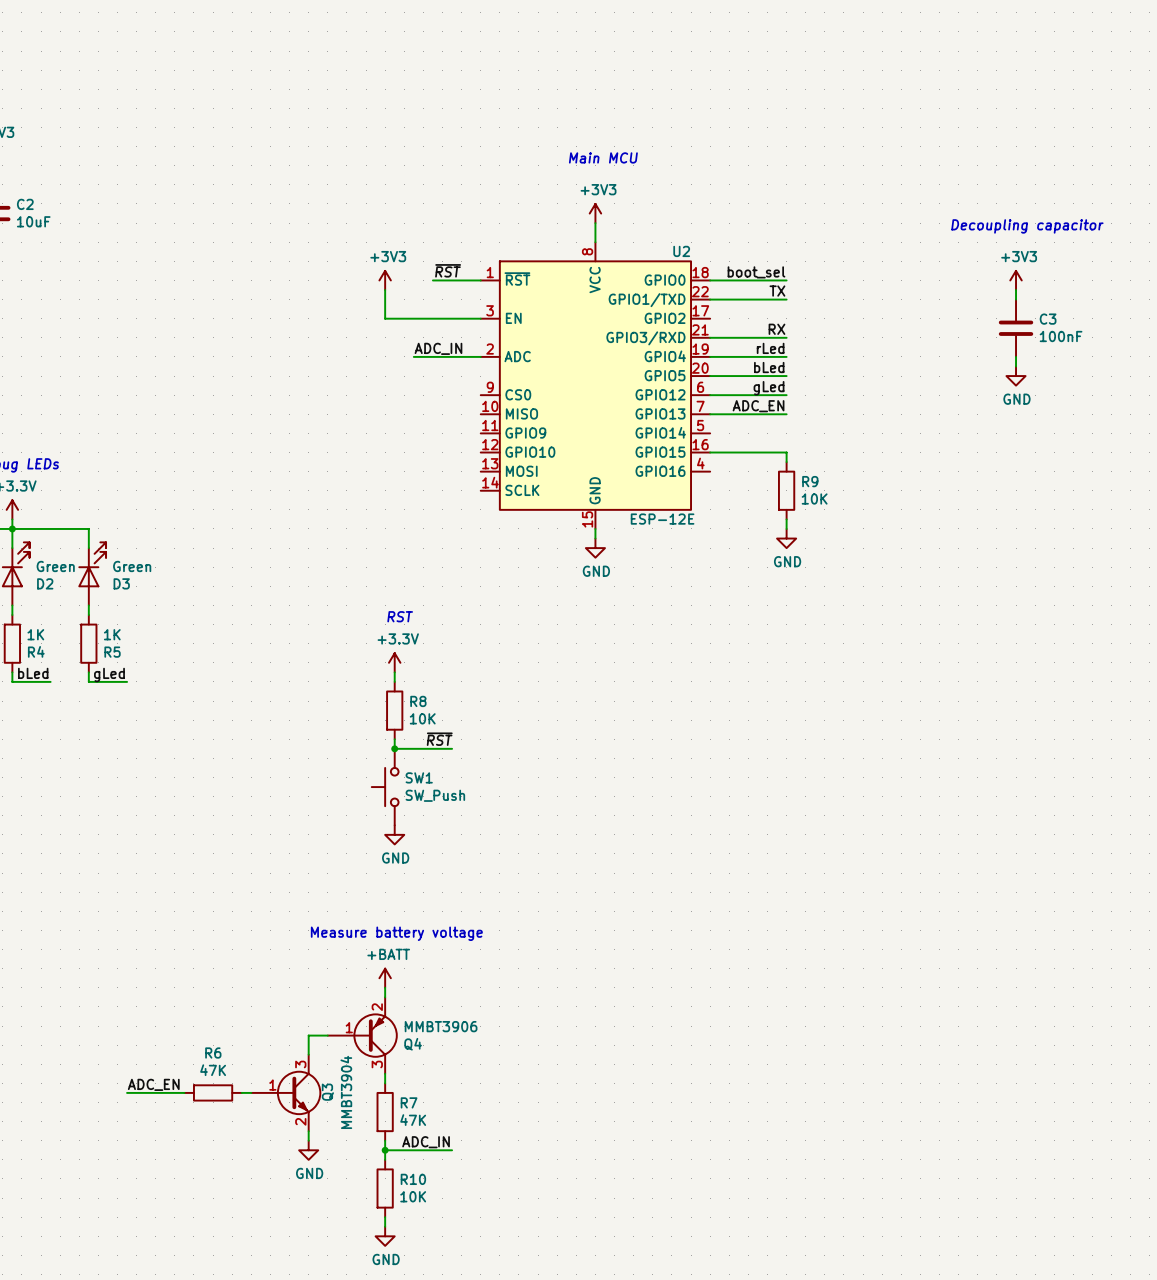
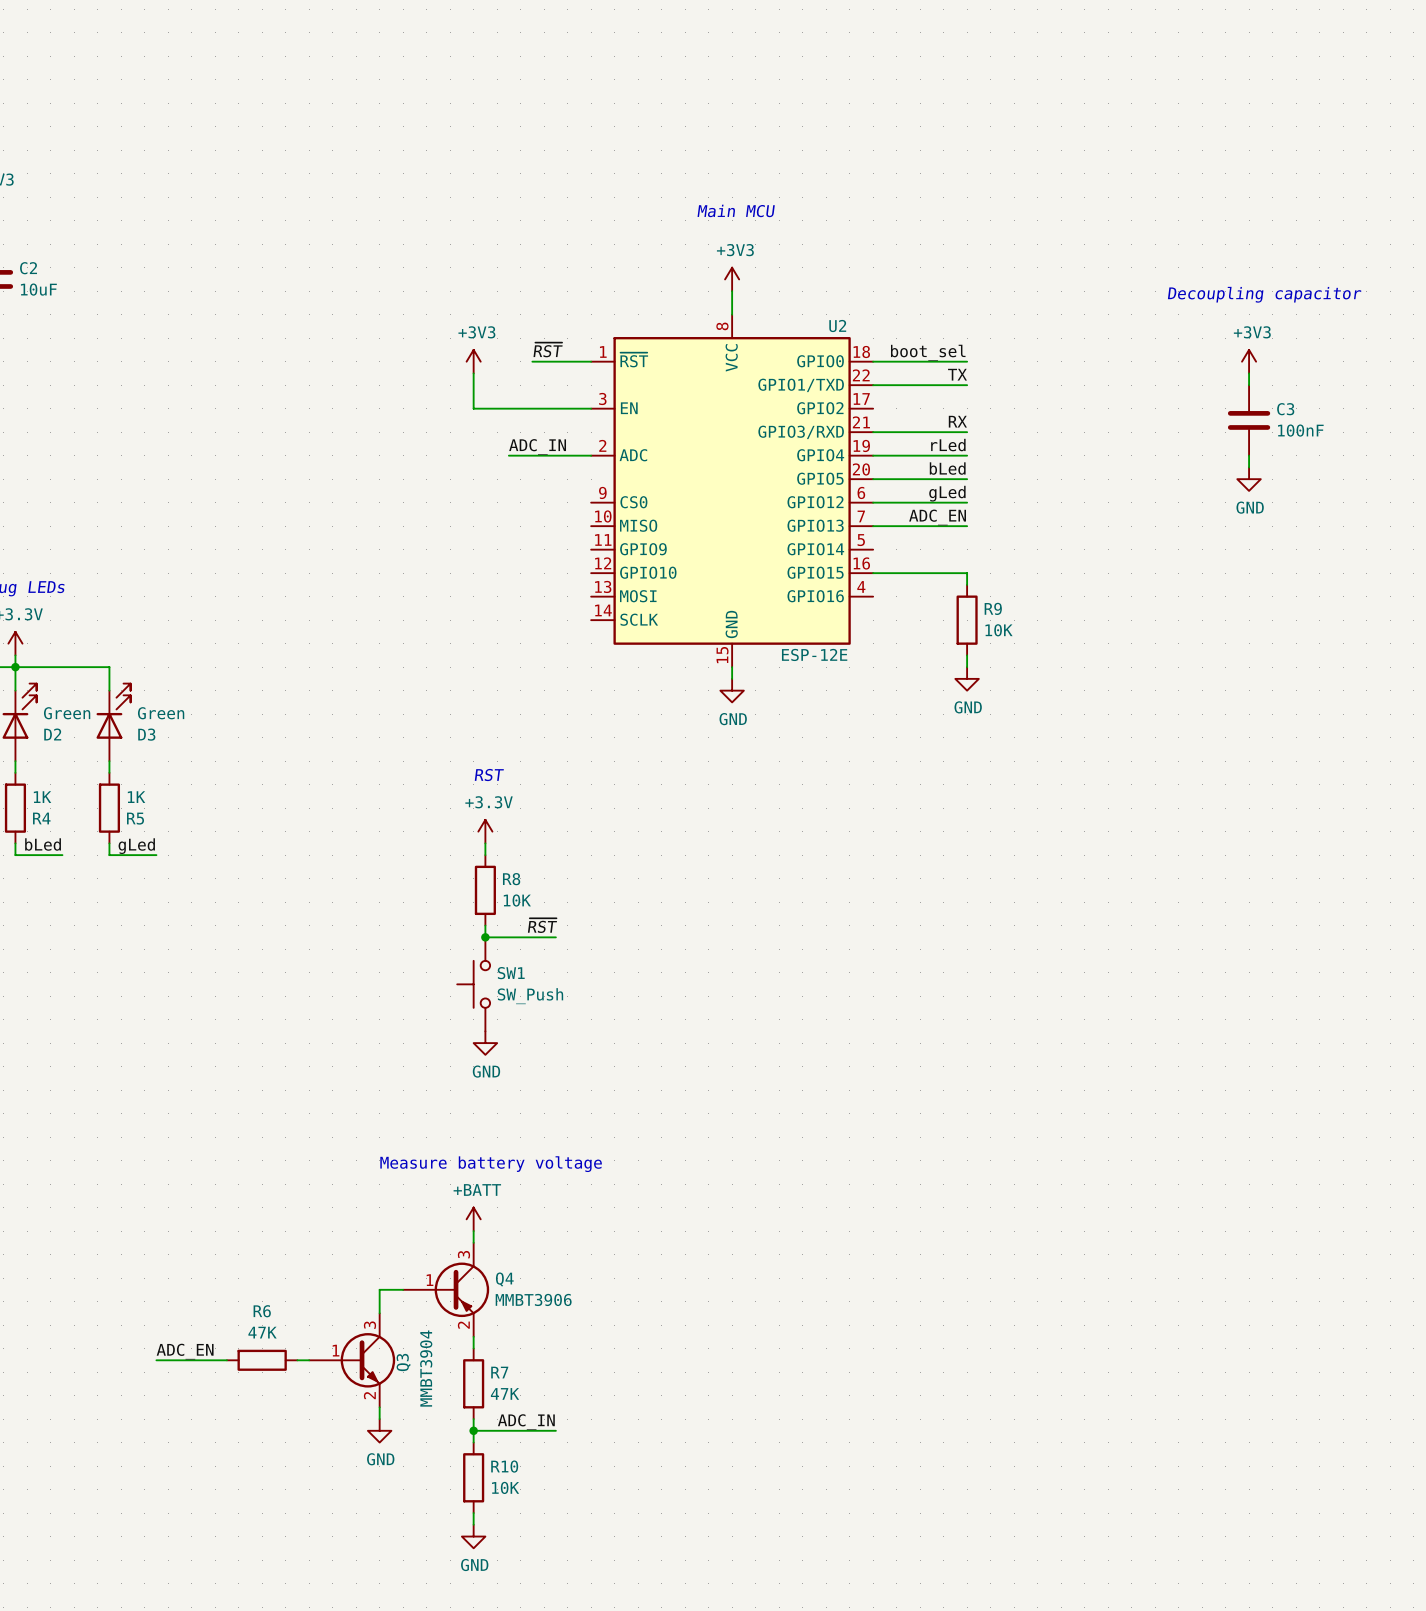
Q4 flip: as is (375, 1035) -> up-down (461, 1289)

